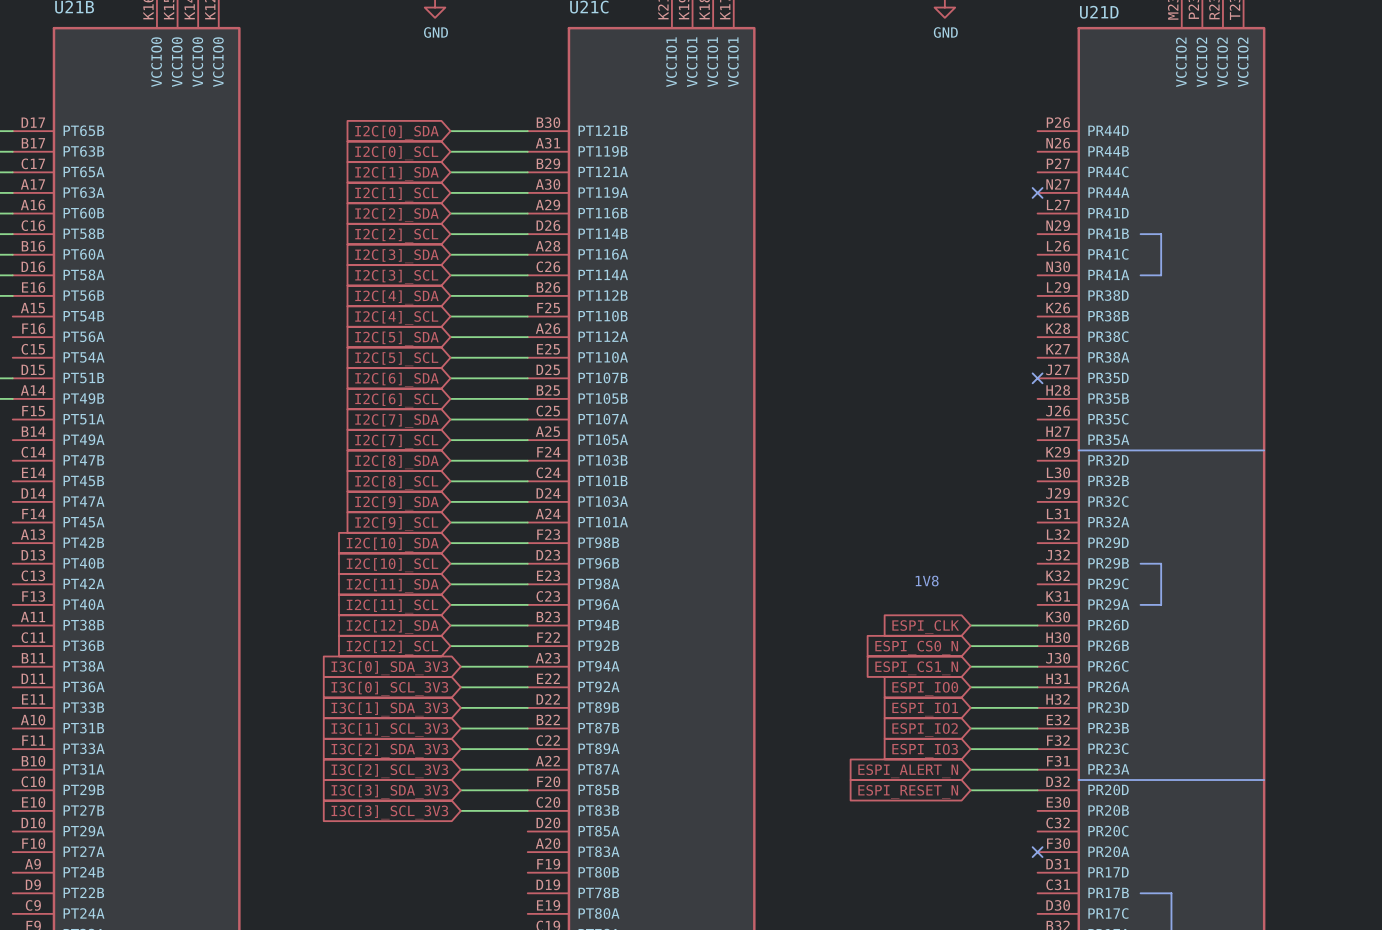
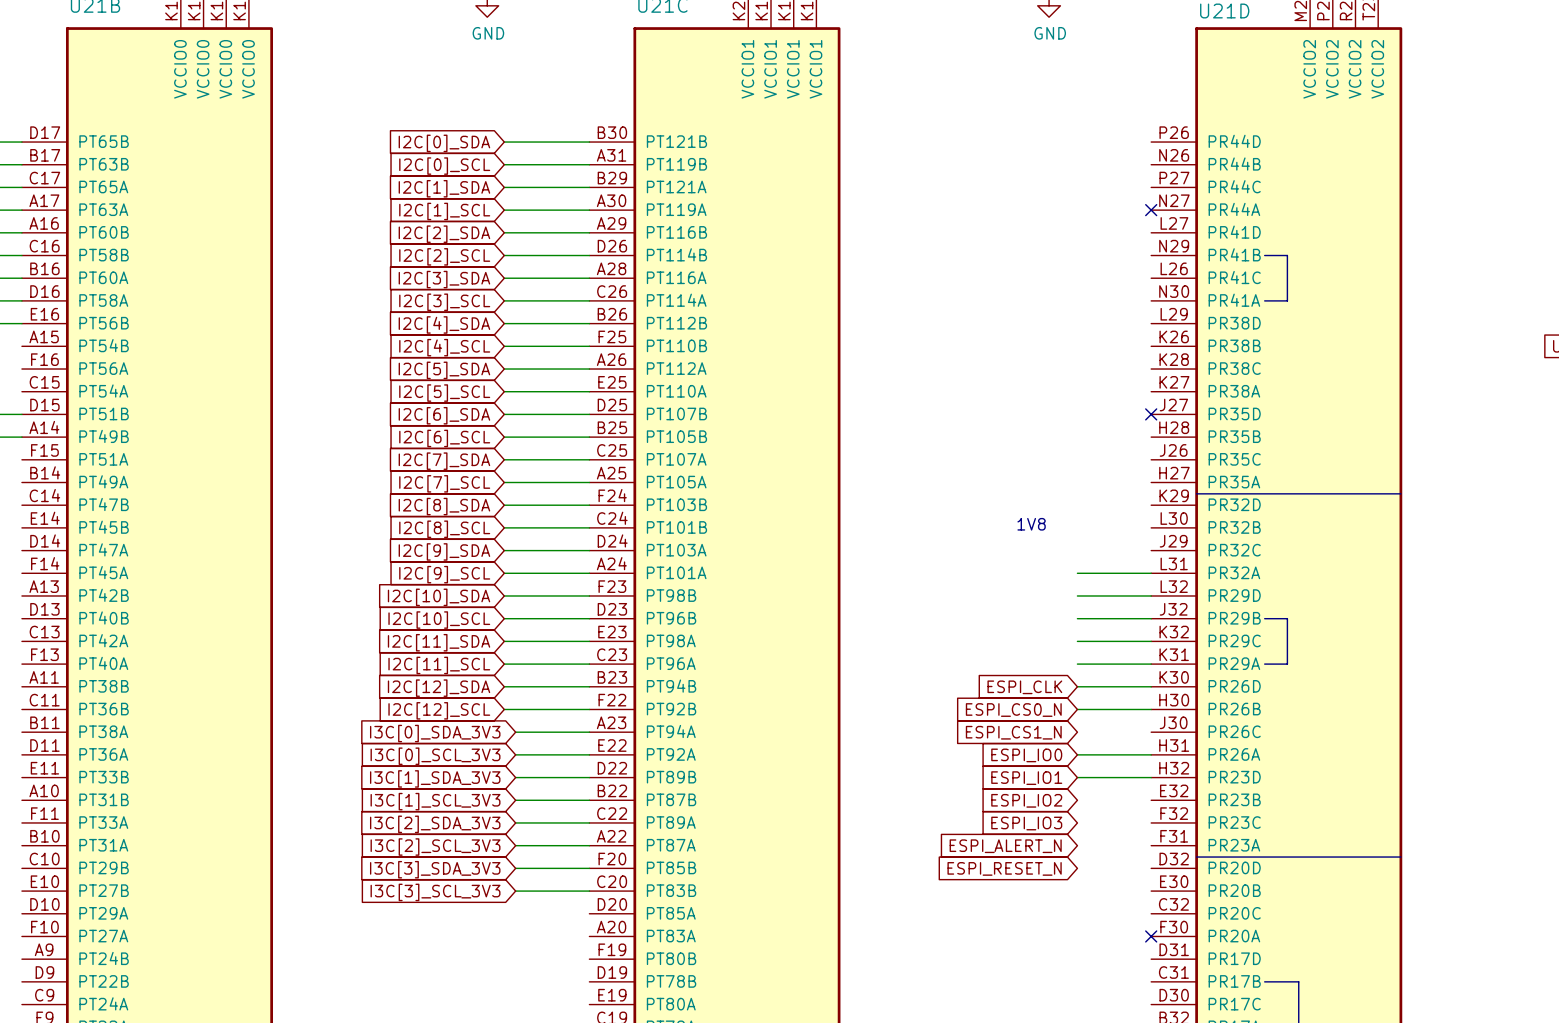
text position: 1V8 (927, 581) -> 1V8 (1031, 524)
wire: (970, 666) (1037, 666) -> (1077, 573) (1151, 573)
wire: (970, 728) (1037, 728) -> (1077, 595) (1151, 595)
wire: (970, 749) (1037, 749) -> (1077, 618) (1151, 618)
wire: (970, 769) (1037, 769) -> (1077, 641) (1151, 641)
wire: (970, 790) (1037, 790) -> (1077, 664) (1151, 664)

